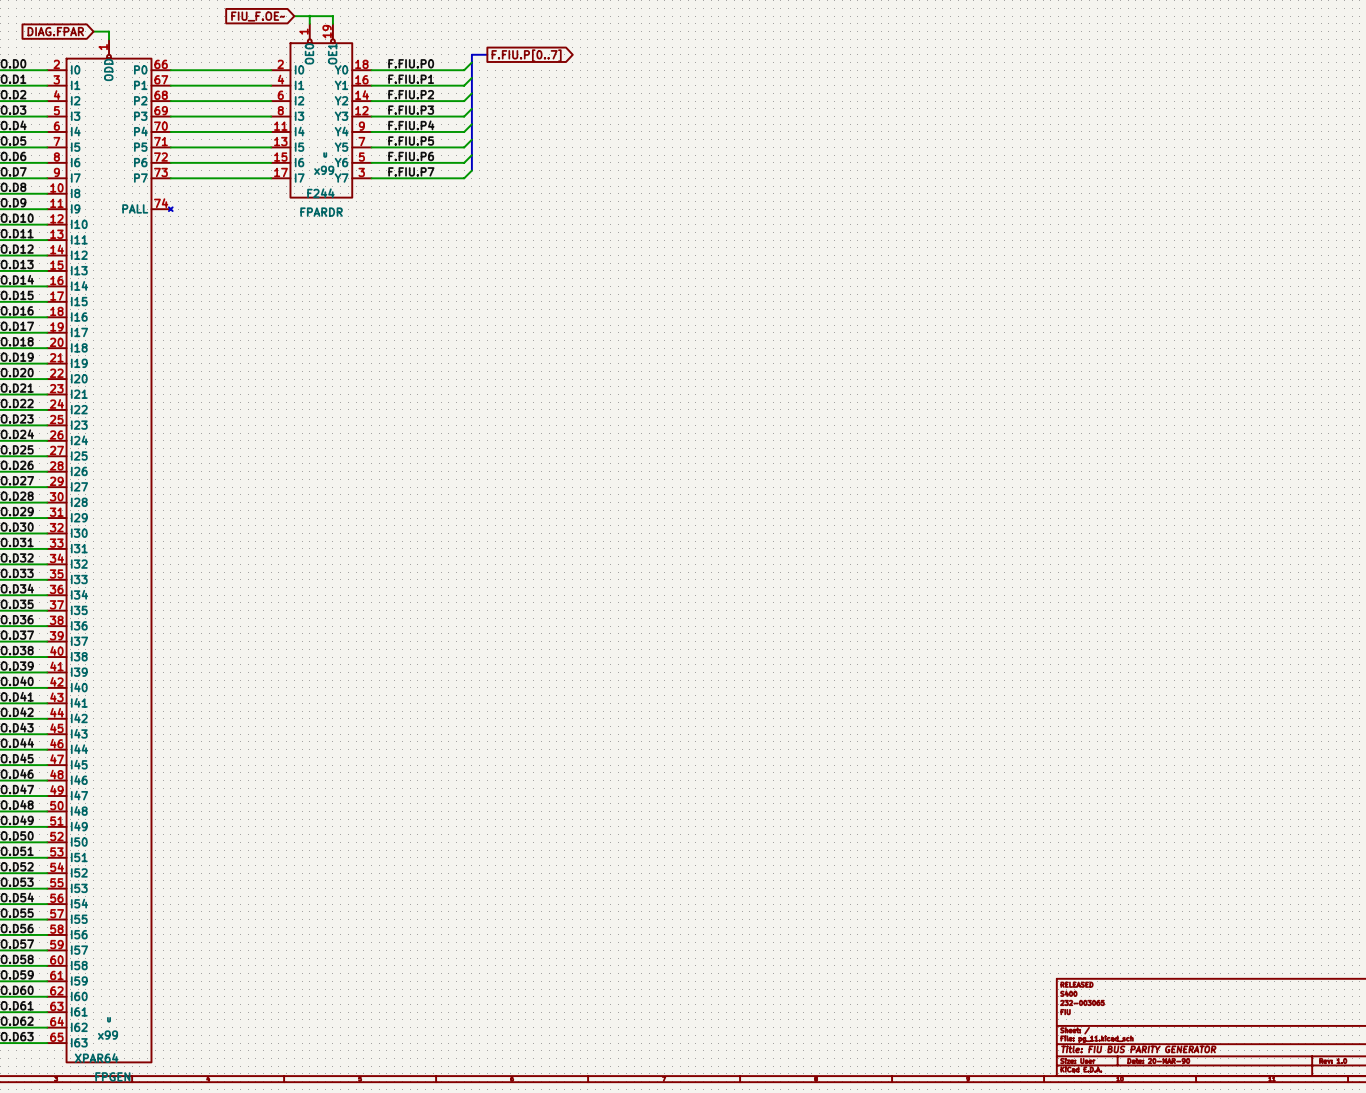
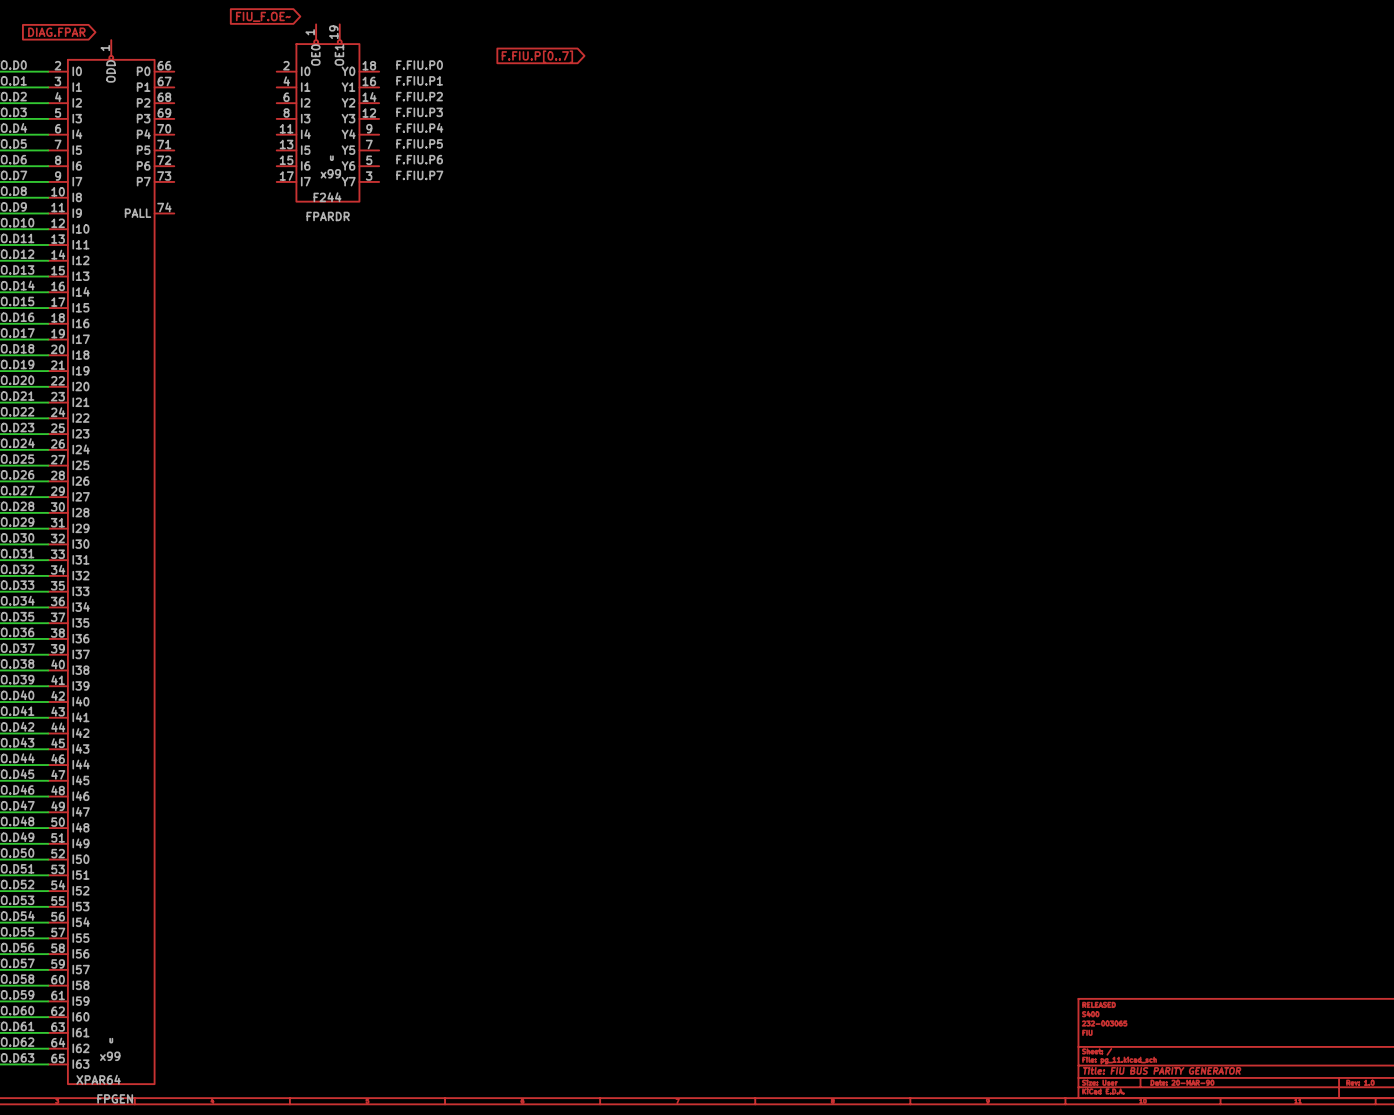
wire: (294, 16) (332, 16) (332, 23) -> none
wire: (309, 16) (309, 23) -> none
wire: (93, 31) (109, 31) (109, 39) -> none
bus: (487, 54) (471, 54) (471, 170) -> none
wire: (471, 62) (464, 70) (371, 70) -> none
wire: (170, 70) (271, 70) -> none
wire: (471, 77) (464, 85) (371, 85) -> none
wire: (170, 85) (271, 85) -> none
wire: (471, 93) (464, 101) (371, 101) -> none
wire: (170, 101) (271, 101) -> none
wire: (471, 108) (464, 116) (371, 116) -> none
wire: (170, 116) (271, 116) -> none
wire: (471, 124) (464, 131) (371, 131) -> none
wire: (170, 131) (271, 131) -> none
wire: (471, 139) (464, 147) (371, 147) -> none
wire: (170, 147) (271, 147) -> none
wire: (471, 155) (464, 162) (371, 162) -> none
wire: (170, 162) (271, 162) -> none
wire: (471, 170) (464, 178) (371, 178) -> none
wire: (170, 178) (271, 178) -> none
no-connect mark: (170, 209) -> none

